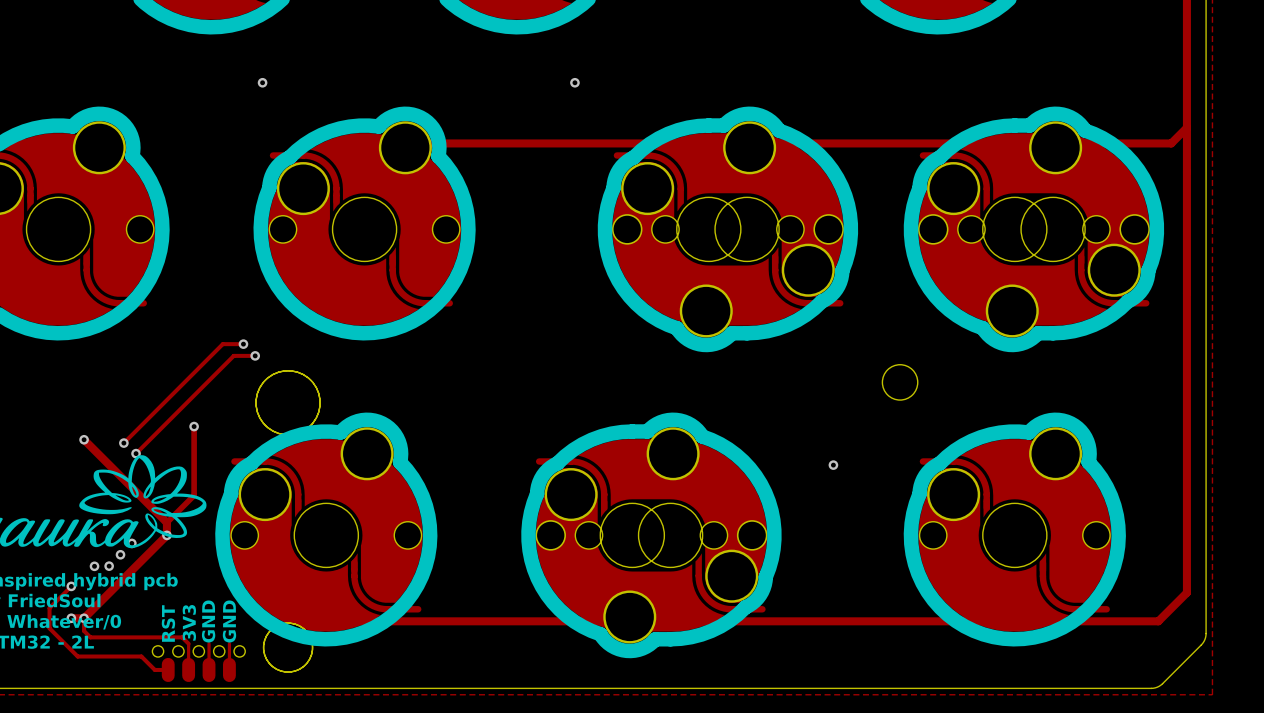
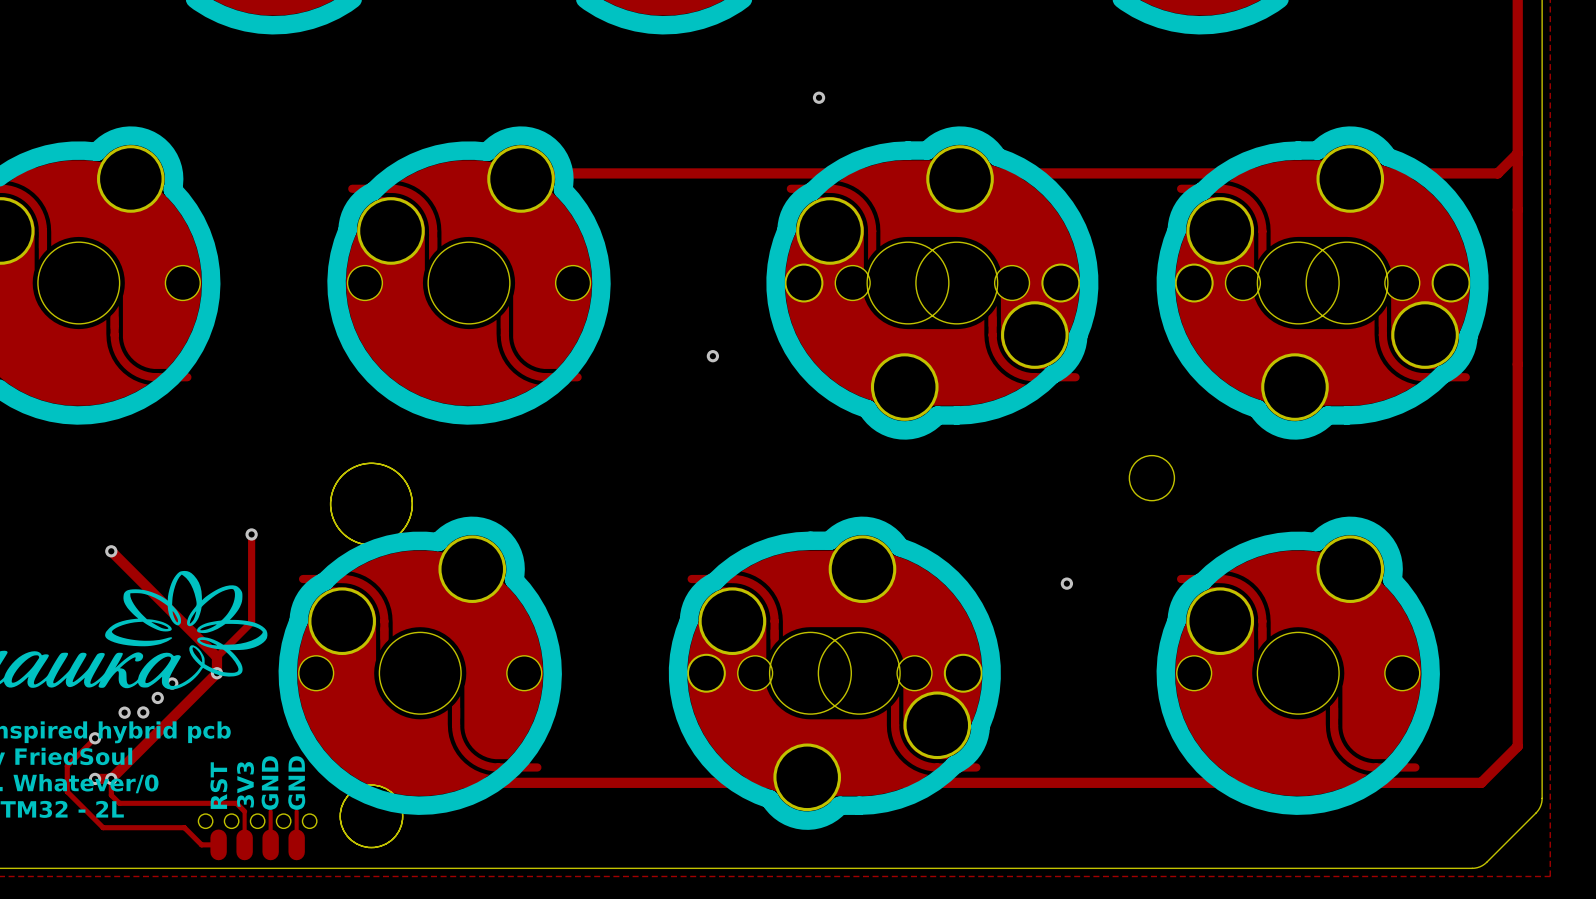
via: (262, 82) -> none
via position: (574, 82) -> (819, 97)
via: none -> (712, 356)
track: (243, 344) (222, 344) (123, 443) -> none
via: (243, 344) -> none
track: (255, 355) (233, 355) (136, 453) -> none
via: (255, 355) -> none
via: (123, 443) -> none
via: (136, 453) -> none

